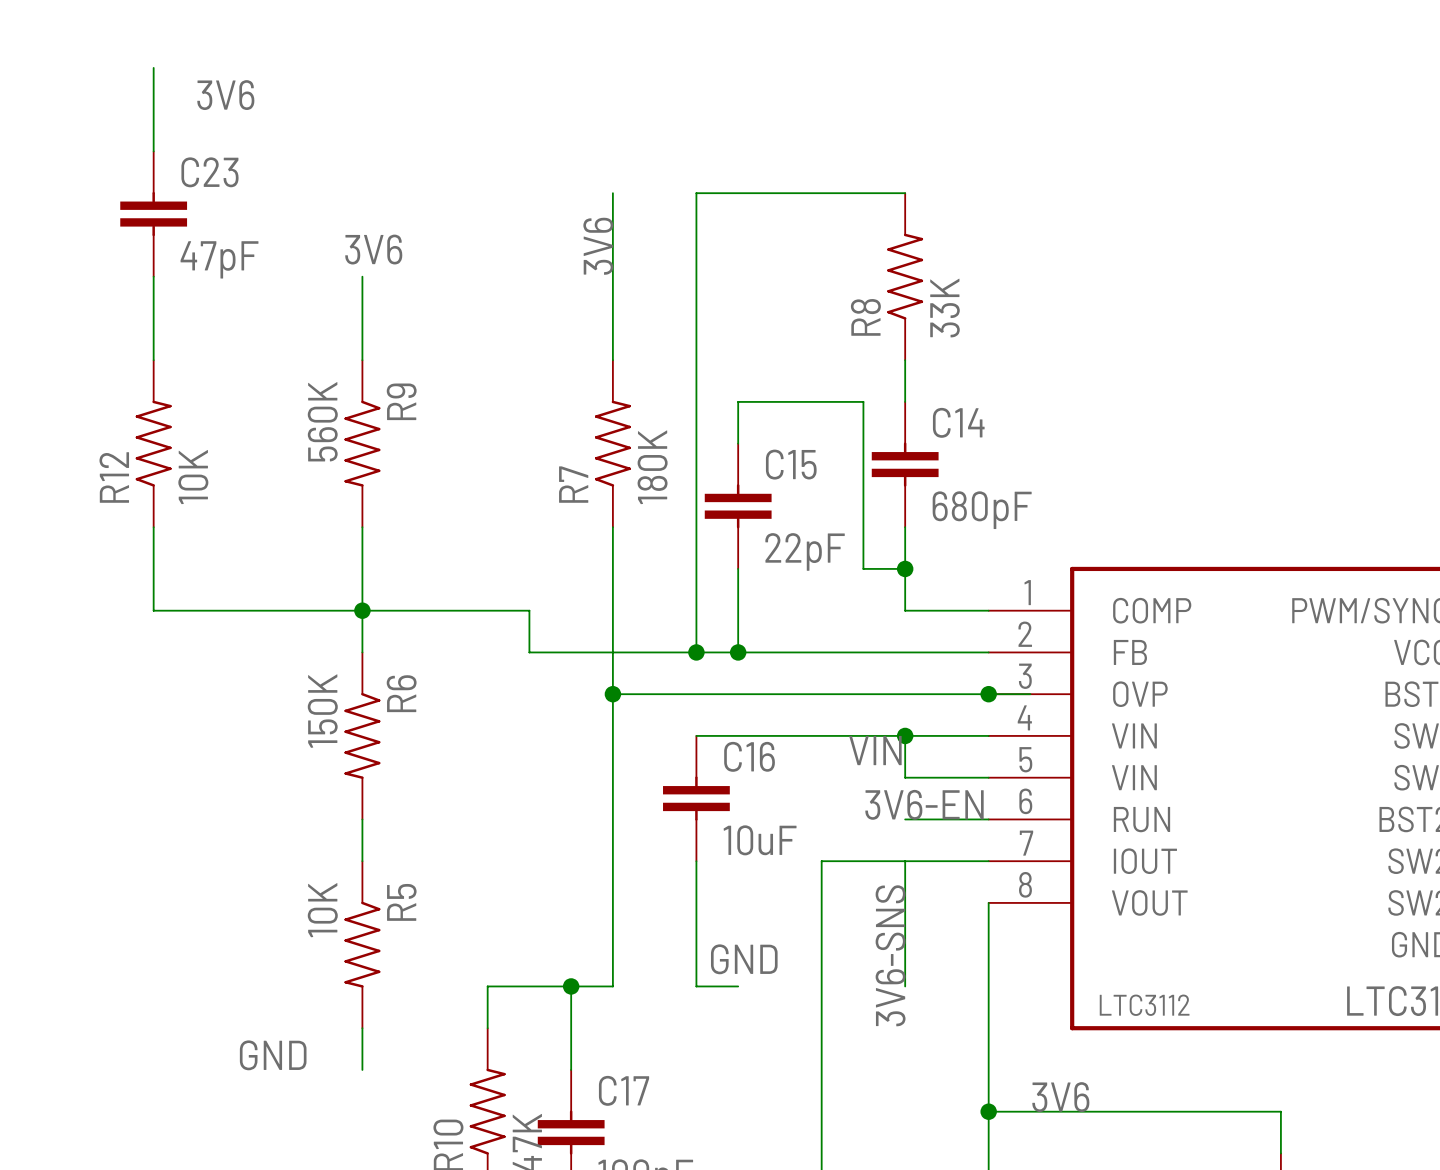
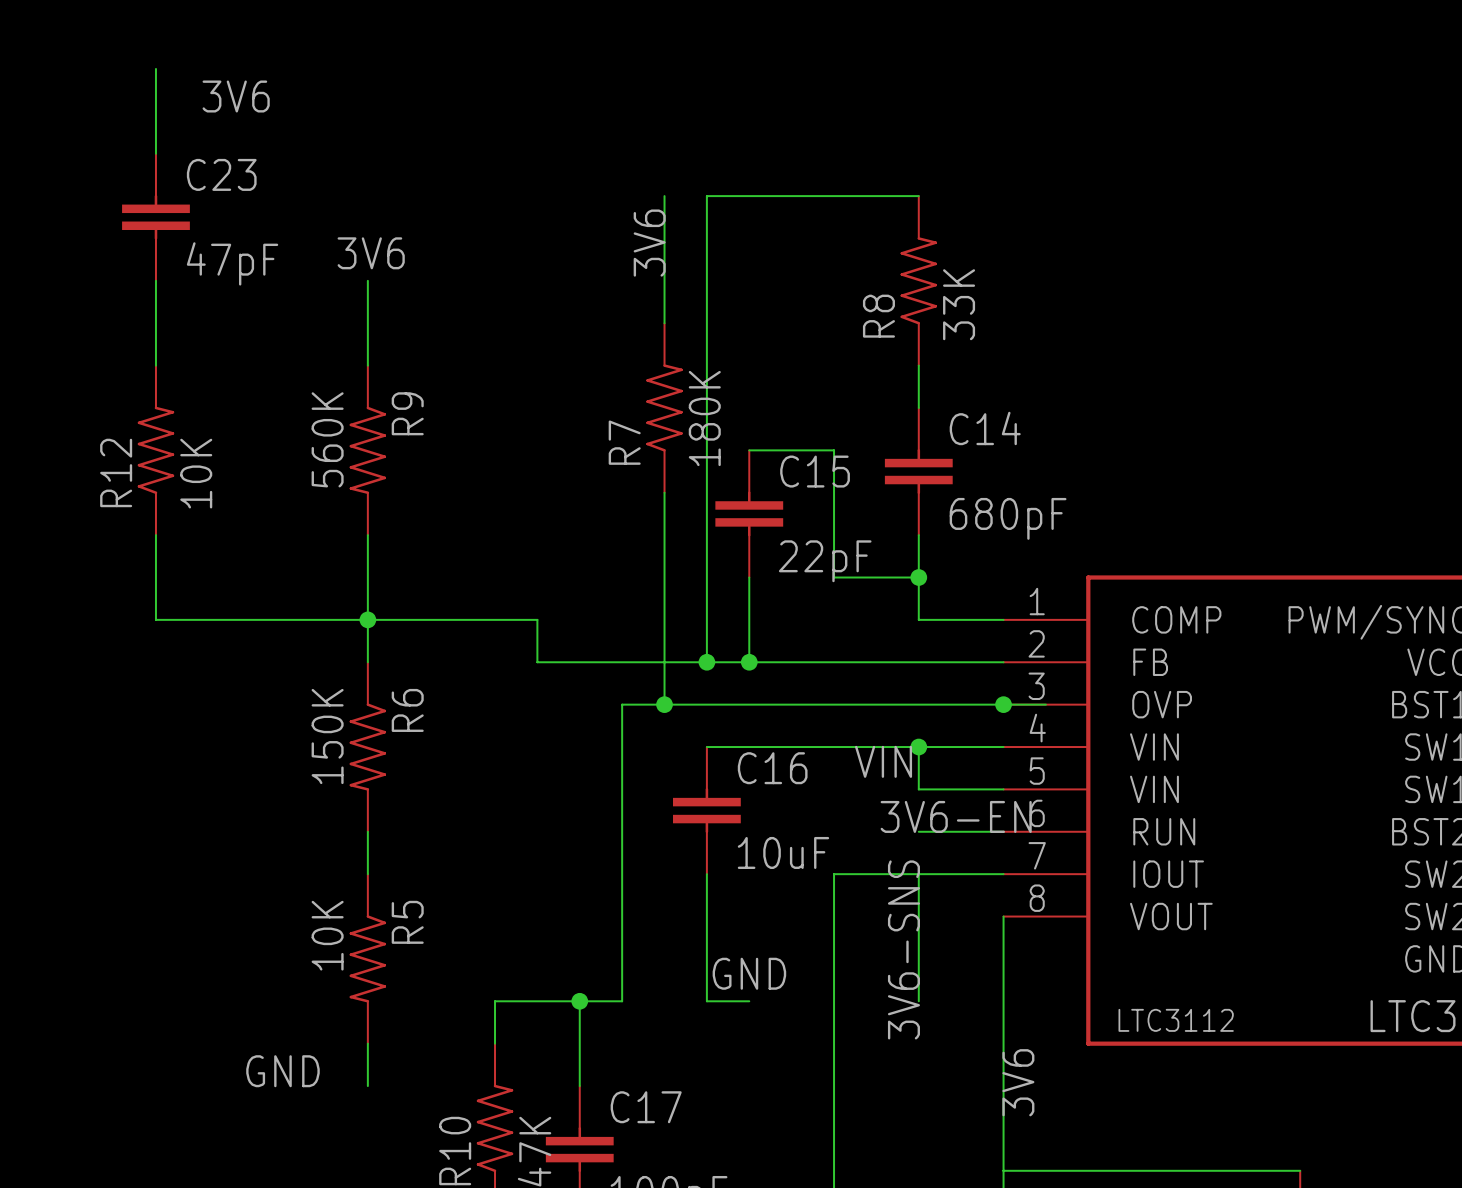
wire: (612, 193) (612, 360) -> none
wire: none -> (664, 196) (664, 323)
label position: 3V6 (598, 246) -> 3V6 (649, 243)
R7 position: (612, 443) -> (664, 407)
wire: (738, 443) (738, 401) (863, 401) (863, 568) -> (749, 450) (834, 450) (834, 577) (876, 577)
wire: none -> (664, 492) (664, 704)
wire: (612, 527) (612, 694) -> none
junction position: (612, 694) -> (664, 704)
label rotation: 0° (1060, 1097) -> 90° counterclockwise (1018, 1082)
wire: (988, 1111) (1280, 1111) (1280, 1153) -> (1003, 1170) (1300, 1170)
junction: (988, 1111) -> none

